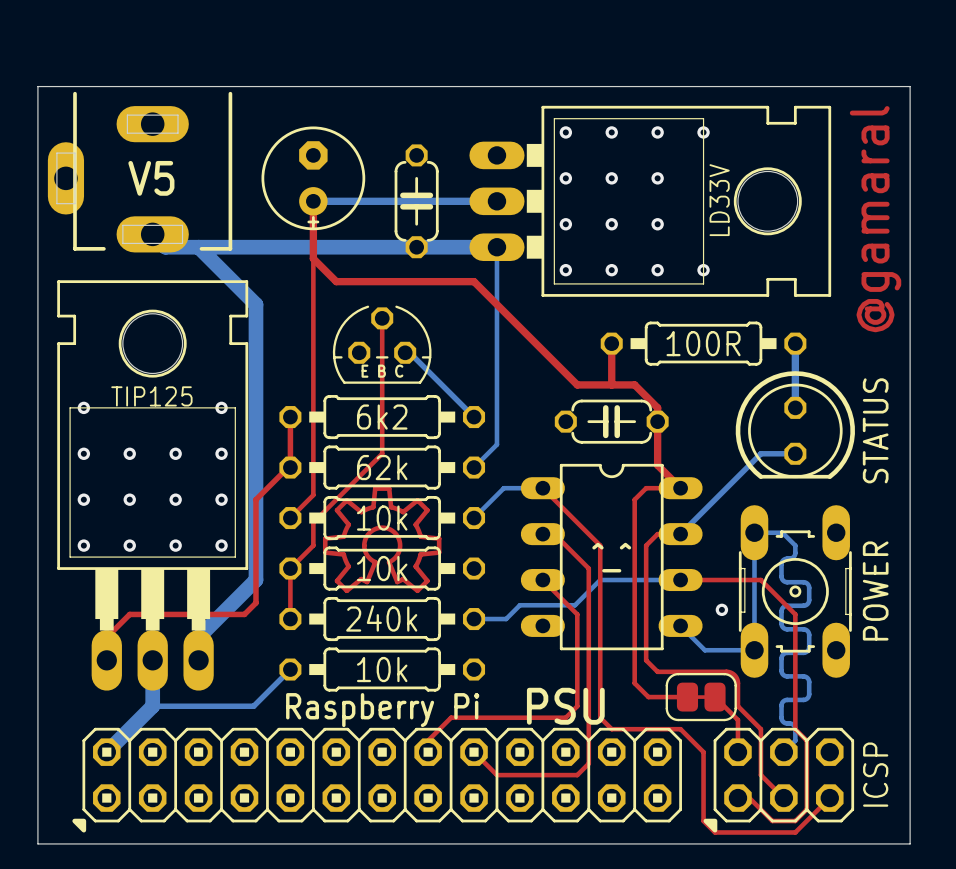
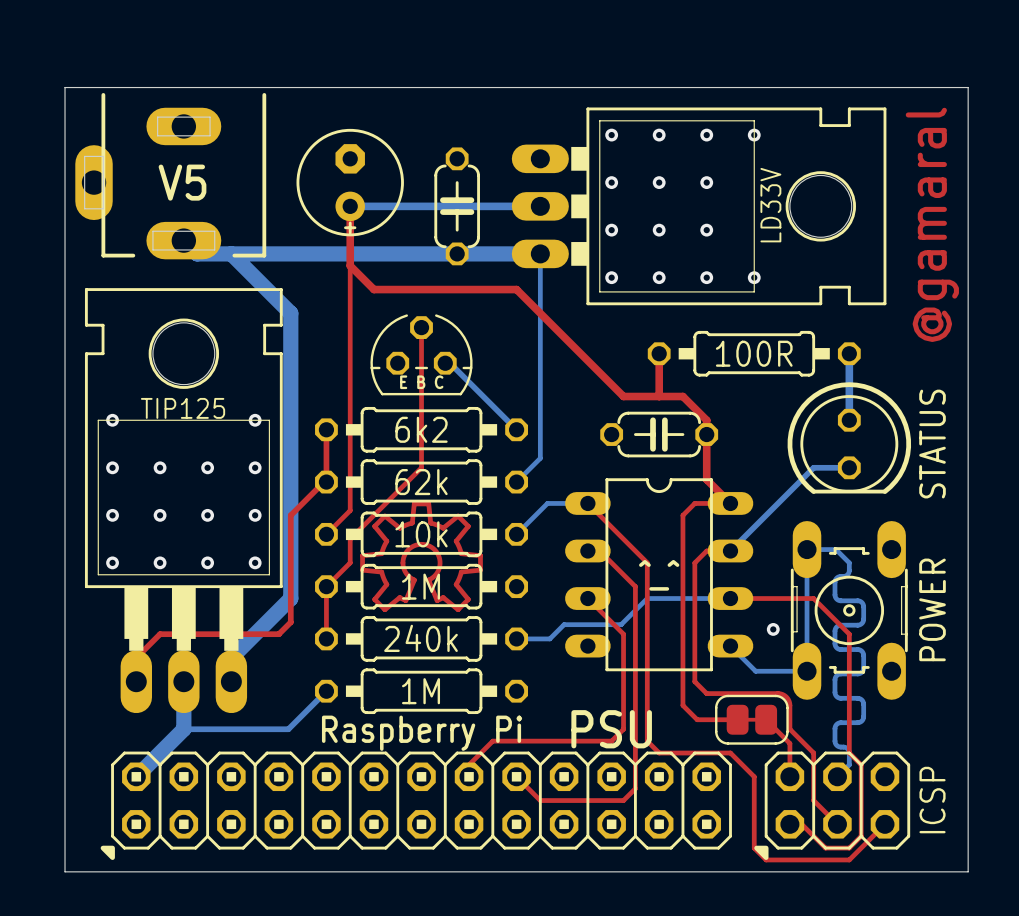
part value: 10k (382, 568) -> 1M (421, 586)
part value: 10k (382, 669) -> 1M (421, 691)

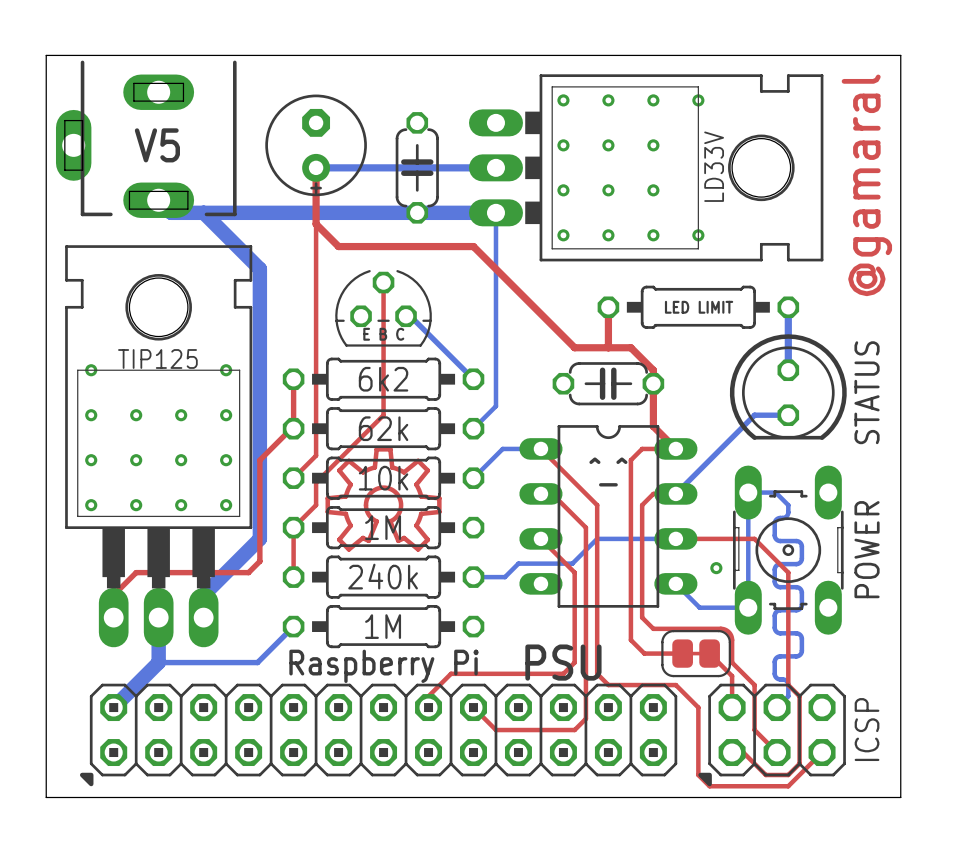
text: none -> LED LIMIT (699, 307)
part value: 100R (754, 353) -> none
text position: ^_^ (659, 575) -> ^_^ (608, 471)

